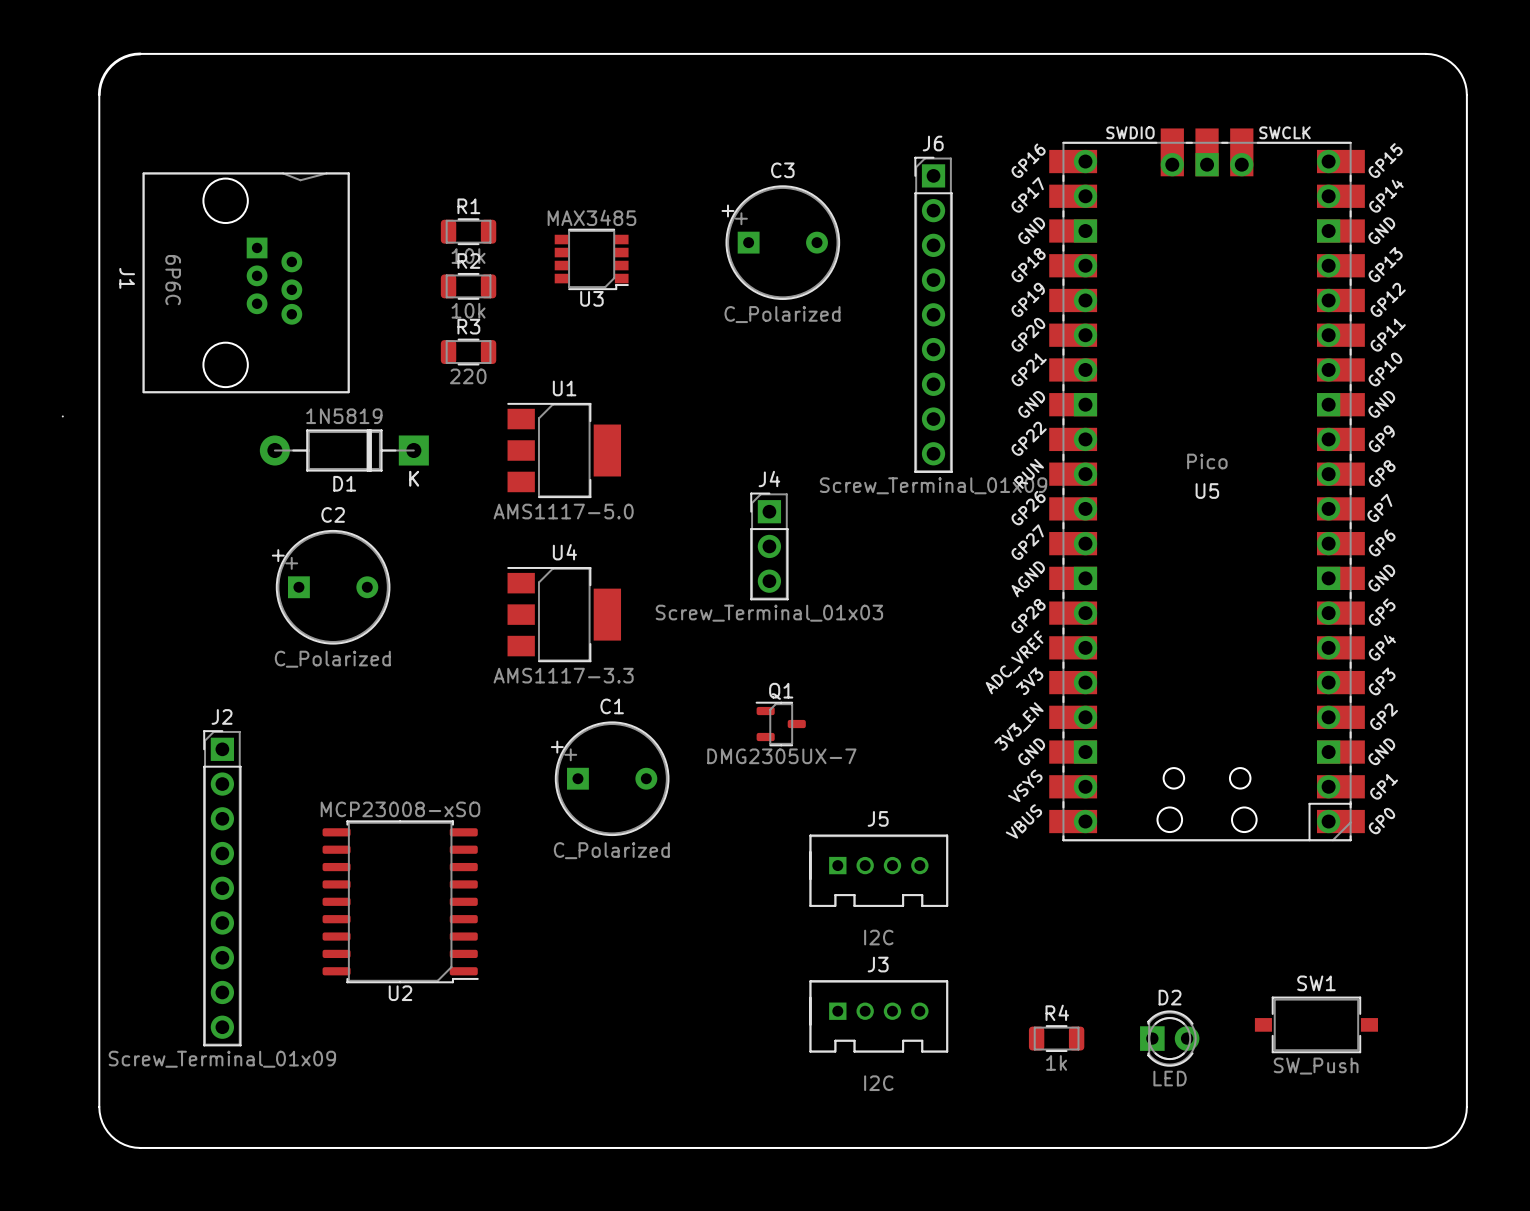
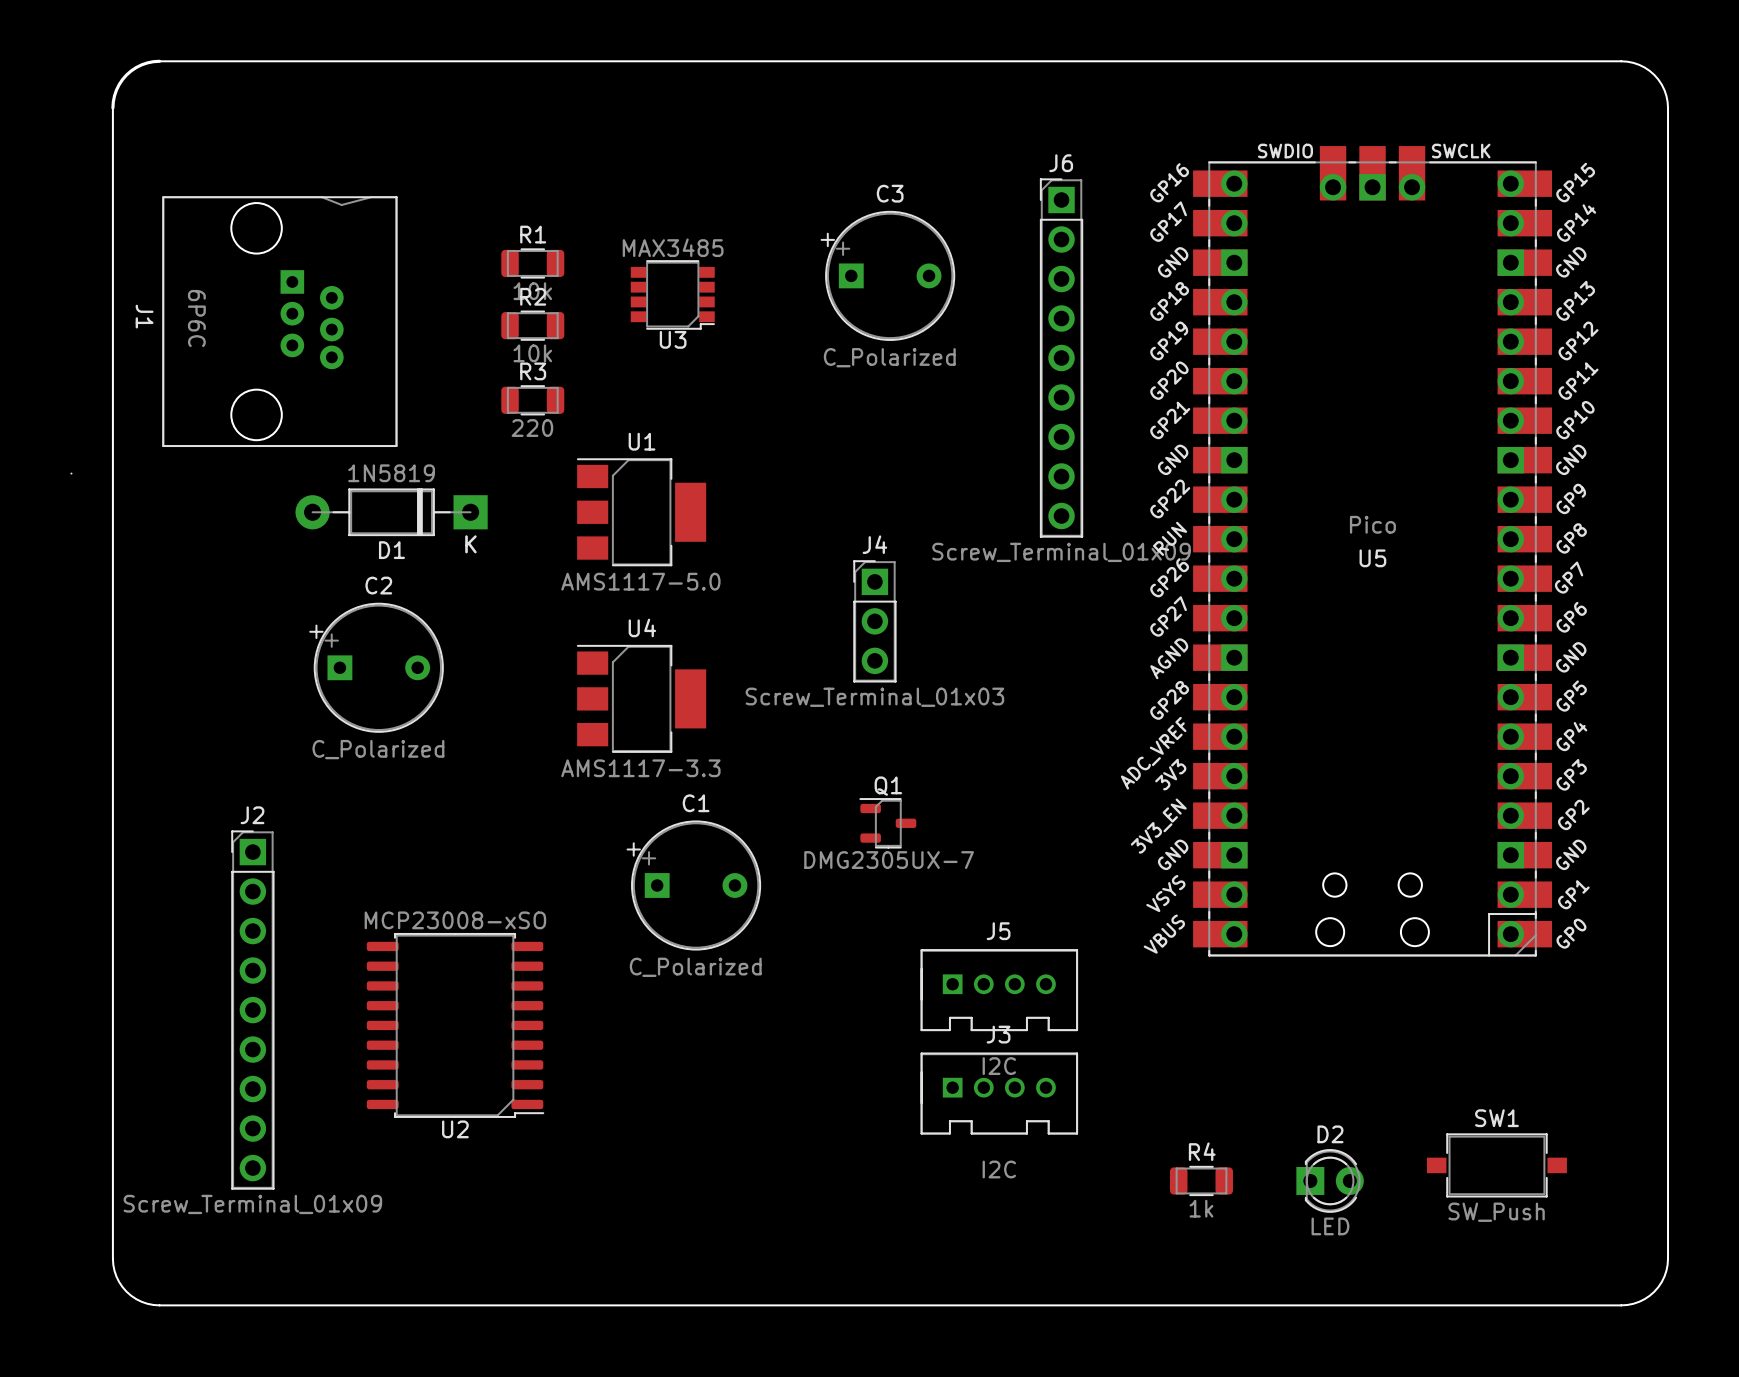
J3 position: (878, 1016) -> (999, 1093)

